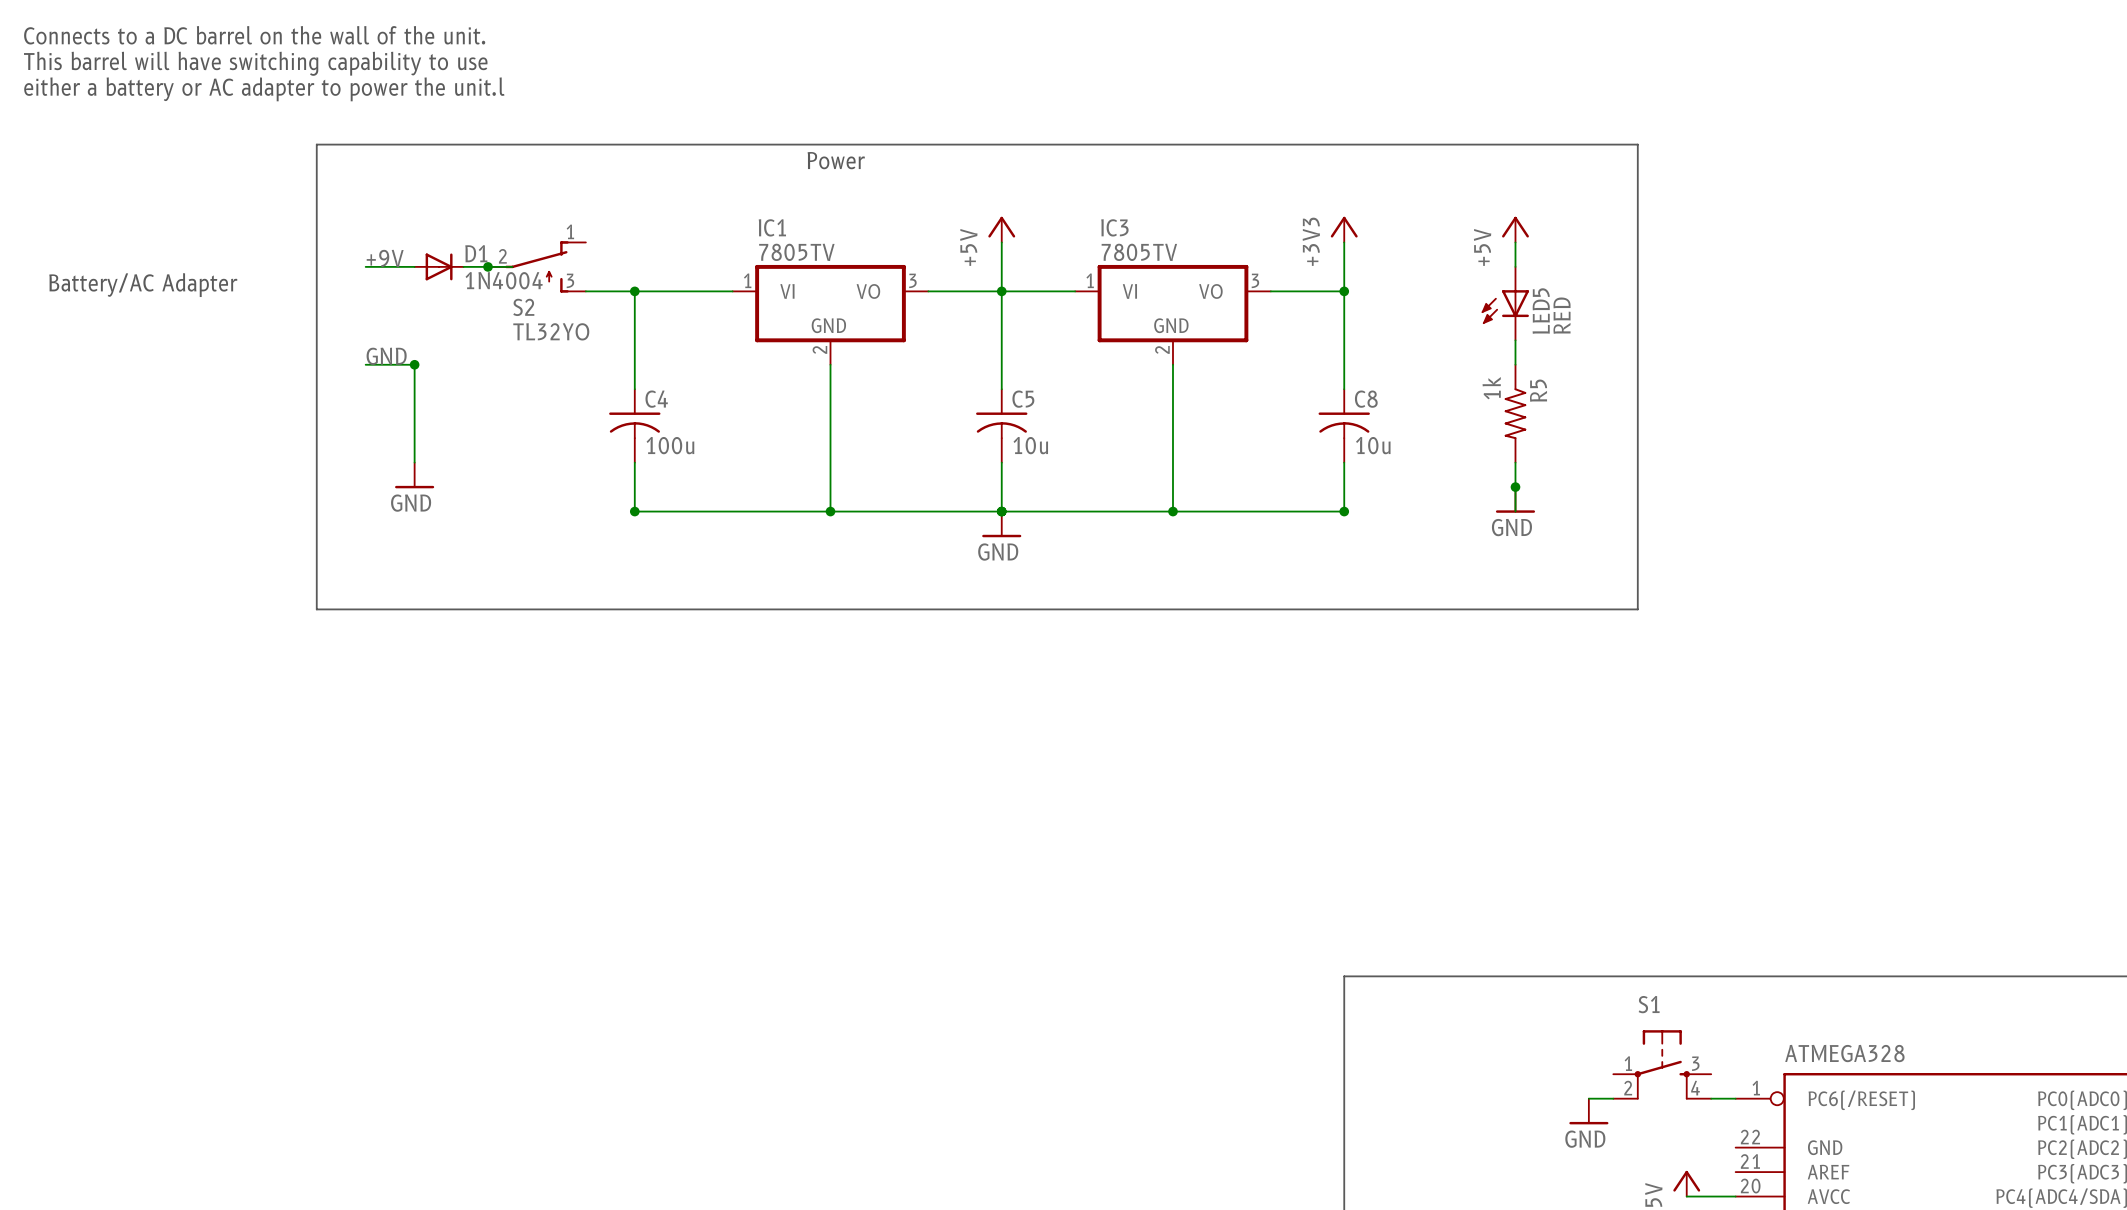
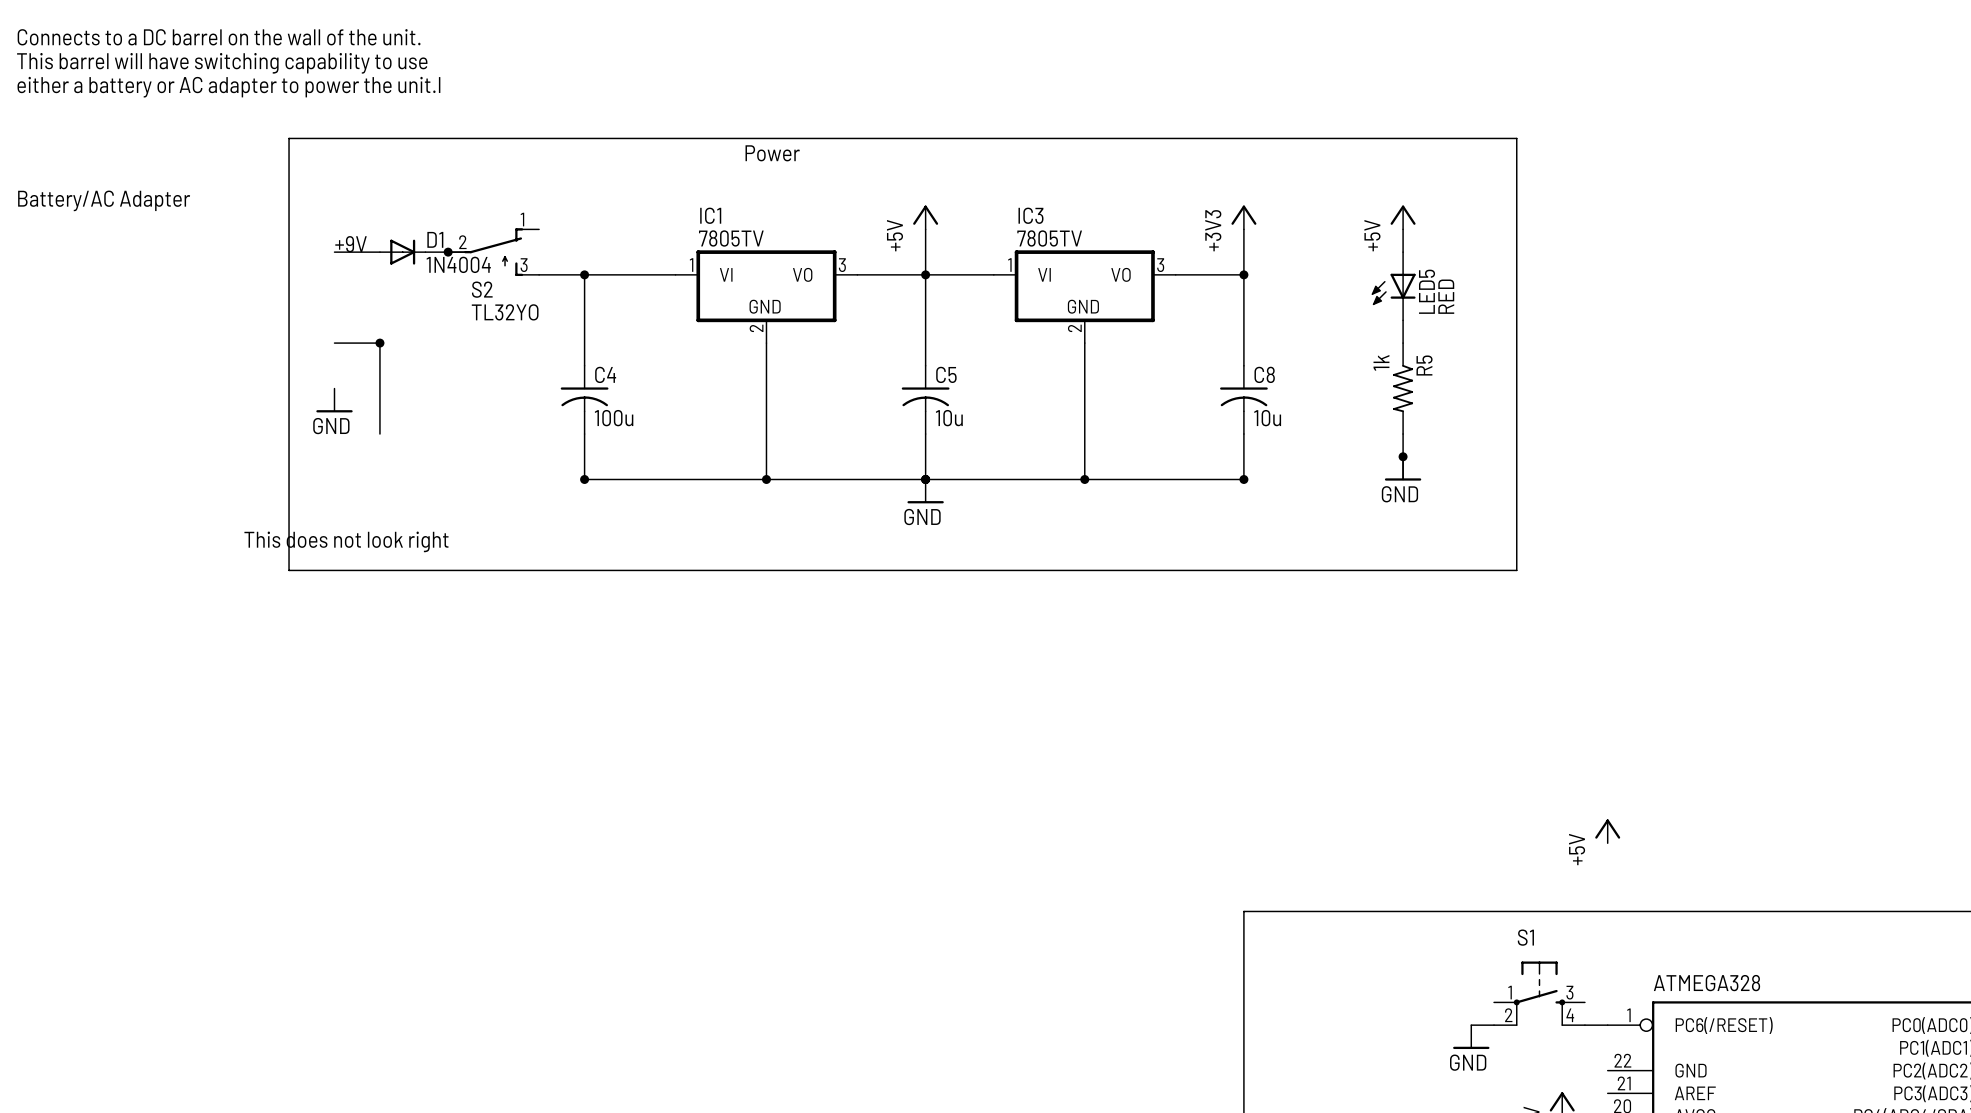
text position: Battery/AC Adapter (143, 285) -> Battery/AC Adapter (104, 200)
label: GND (386, 356) -> none
power symbol position: GND (414, 475) -> GND (334, 400)
text: none -> This does not look right (346, 541)
power symbol: none -> +5V (1607, 831)

